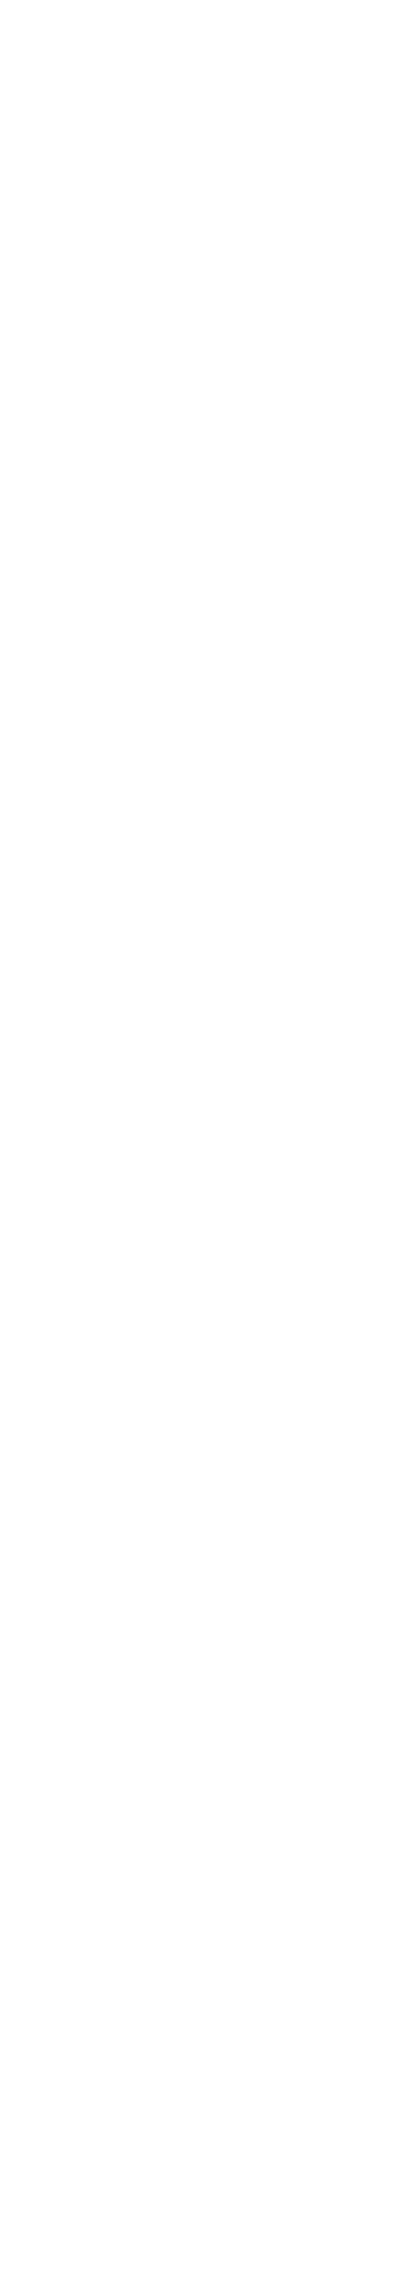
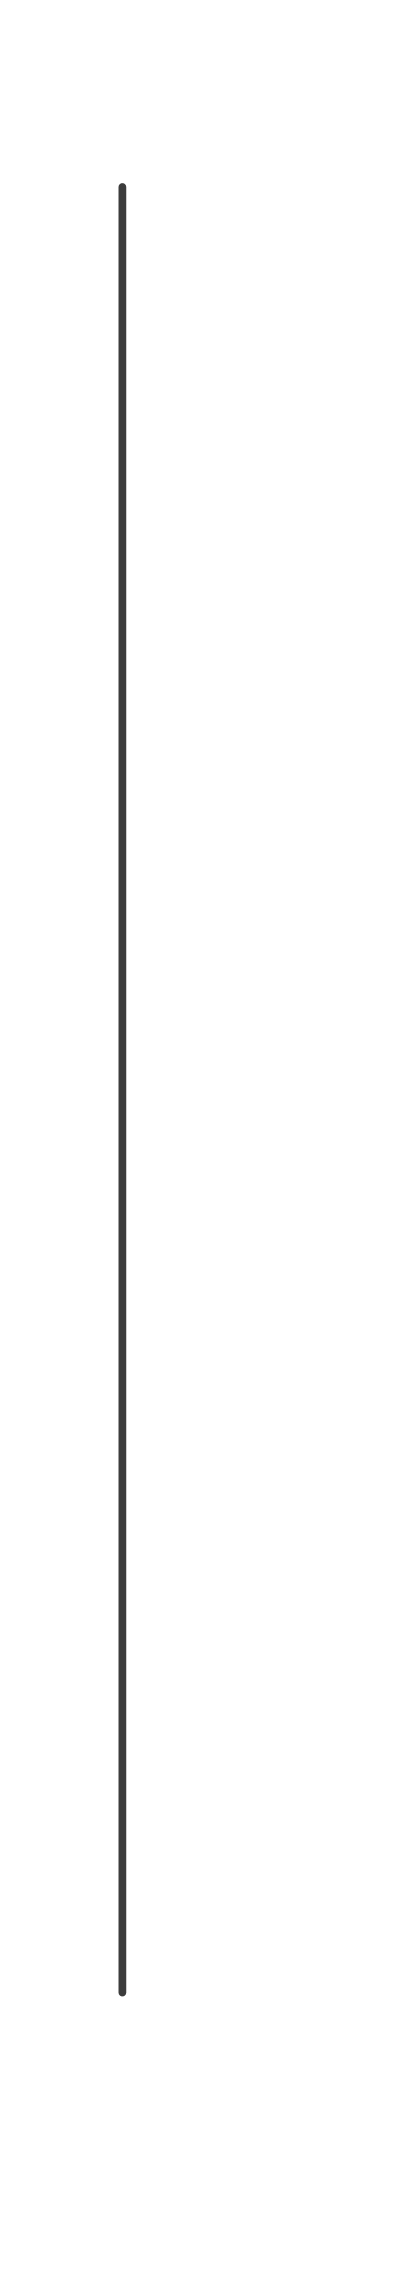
line: none -> (122, 186) (122, 1992)

